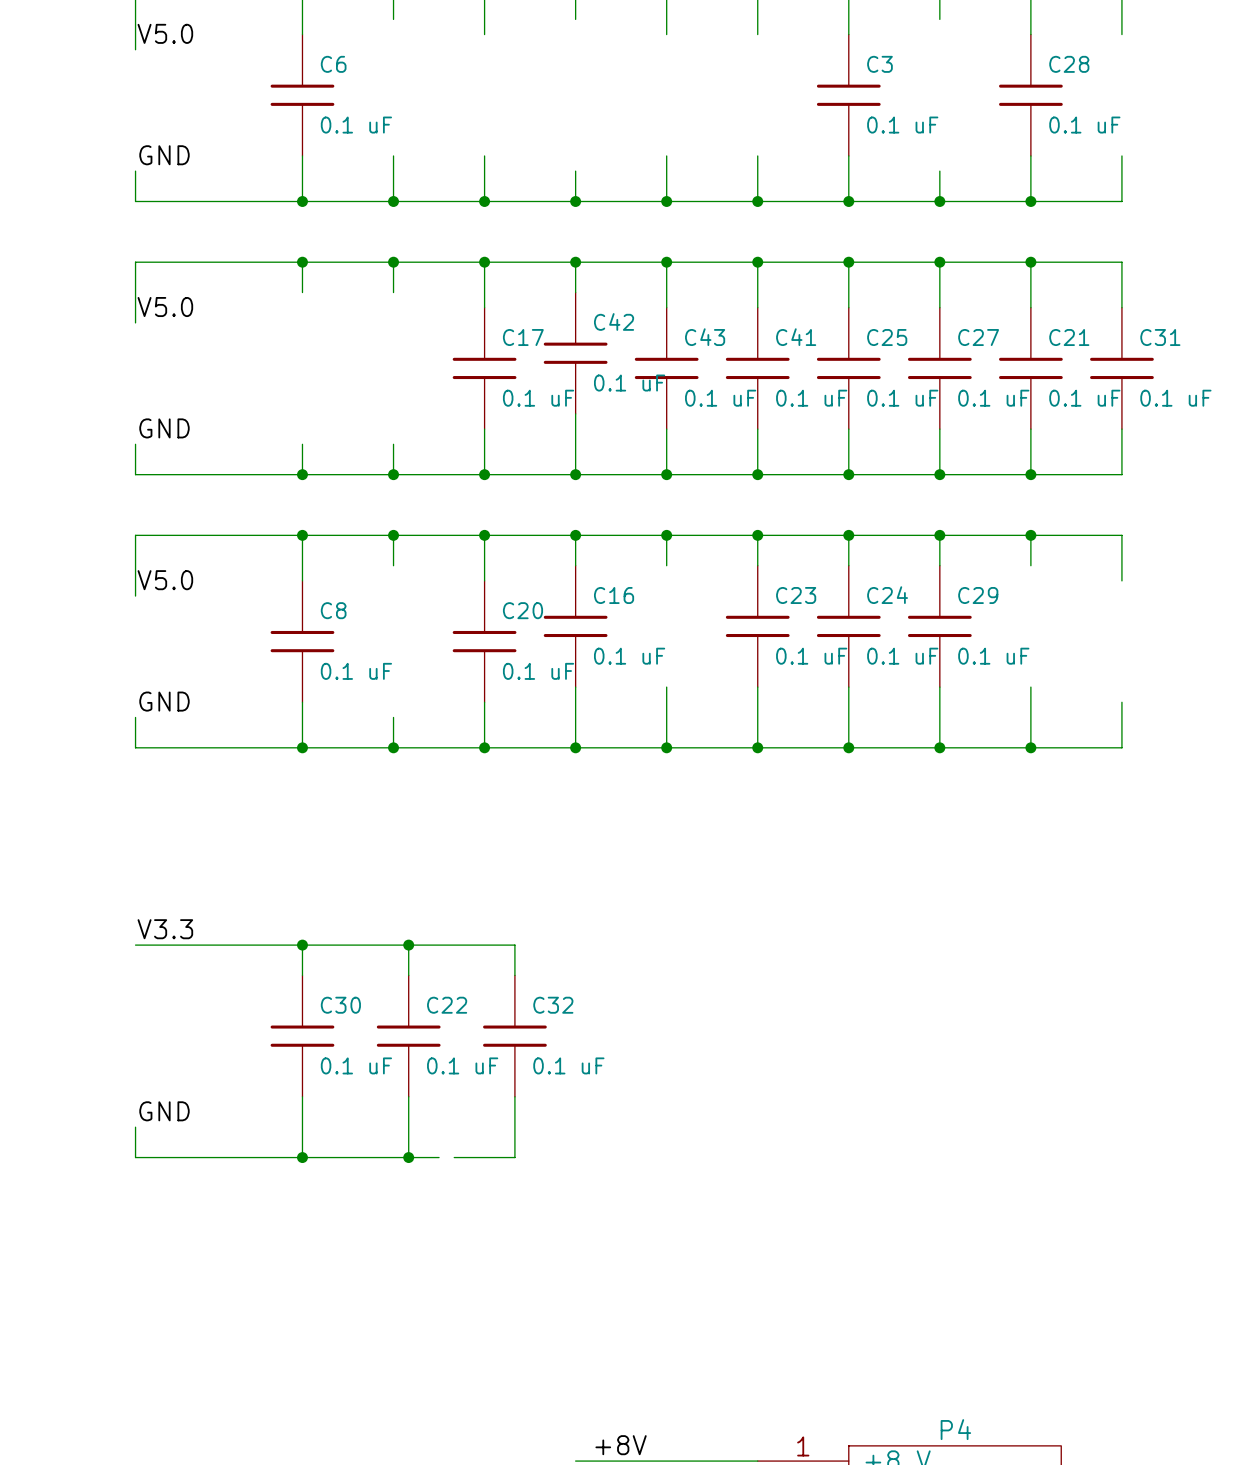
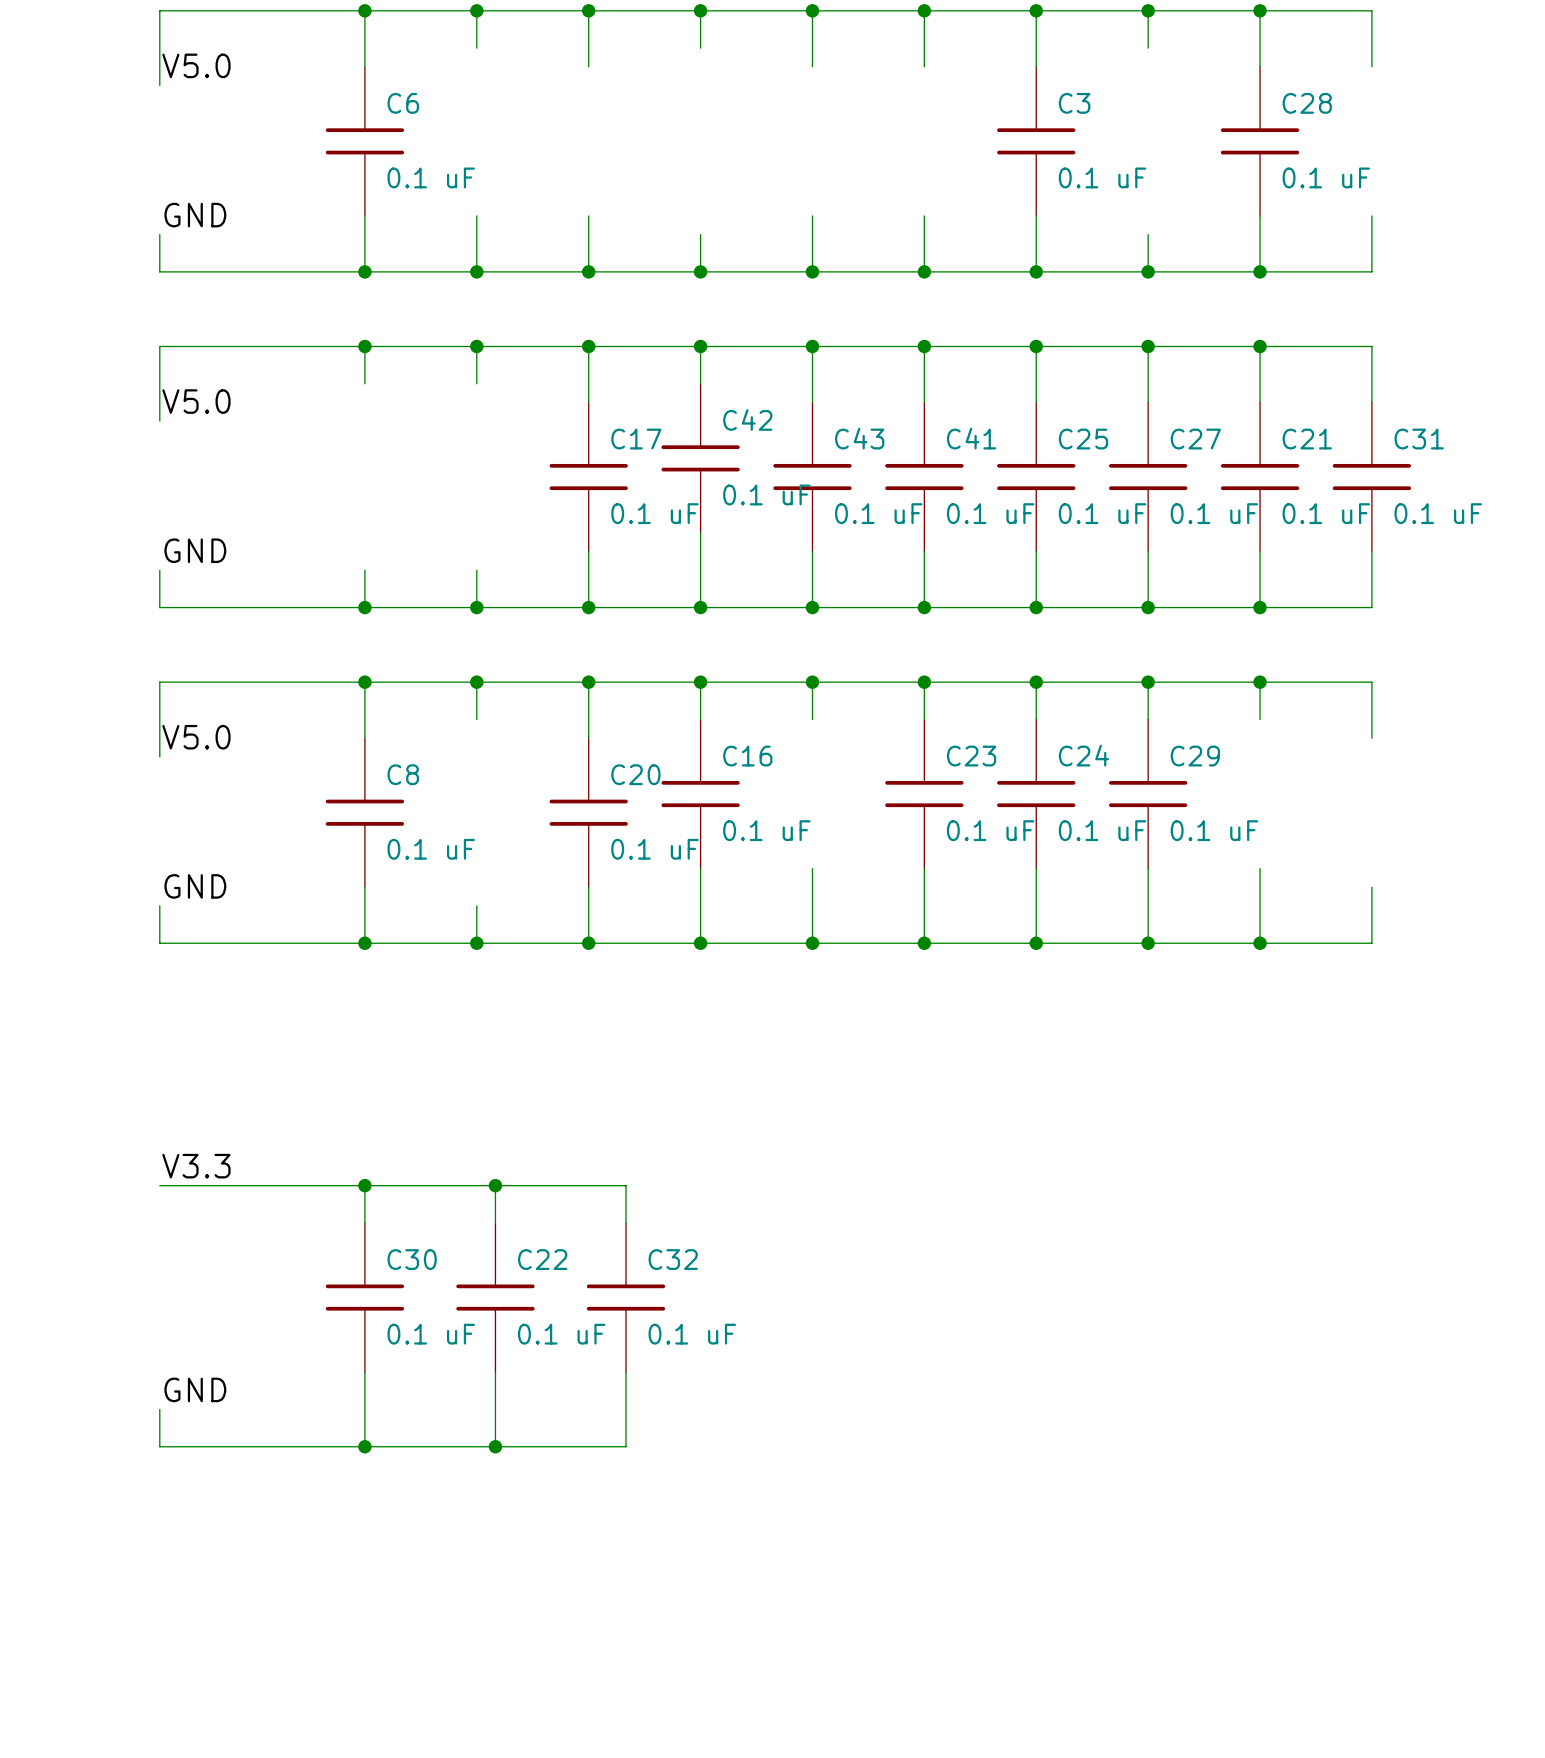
wire: none -> (532, 1446) (551, 1446)

